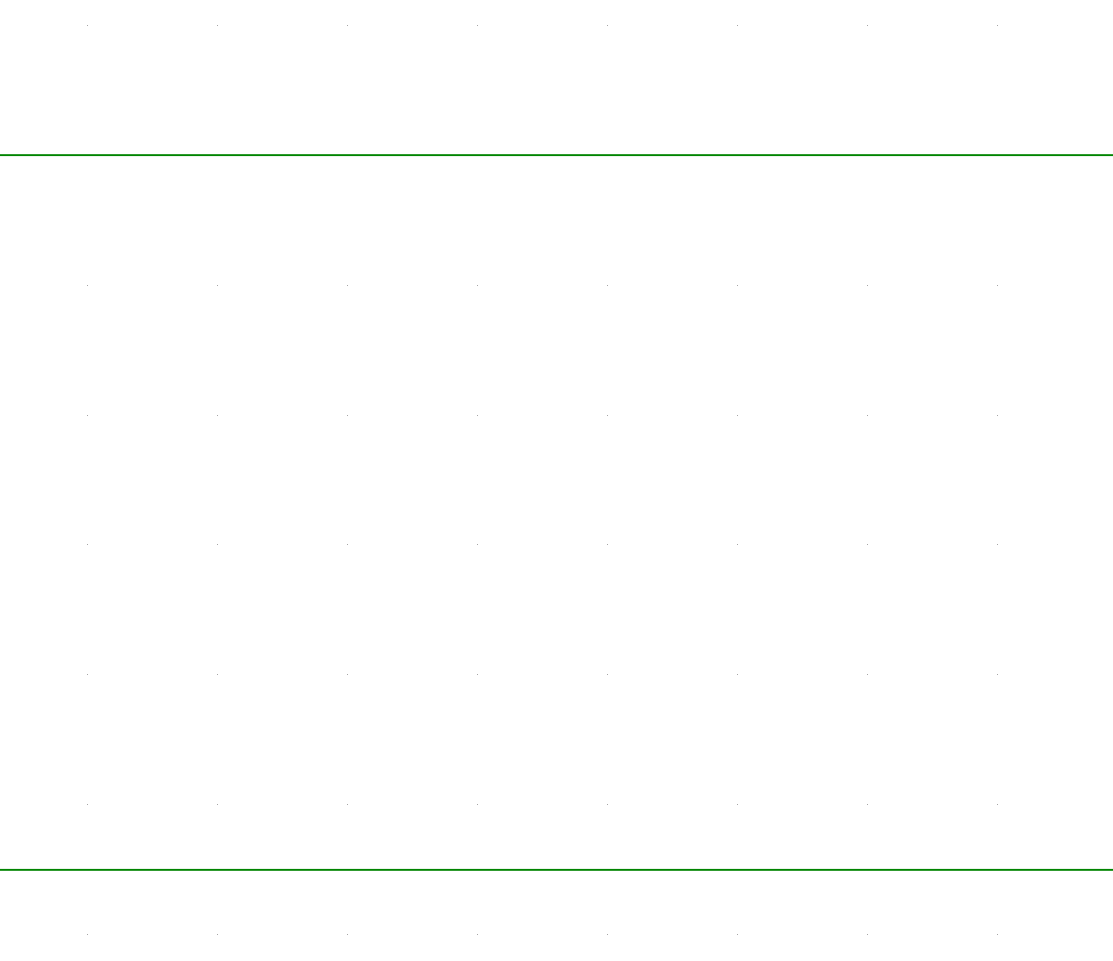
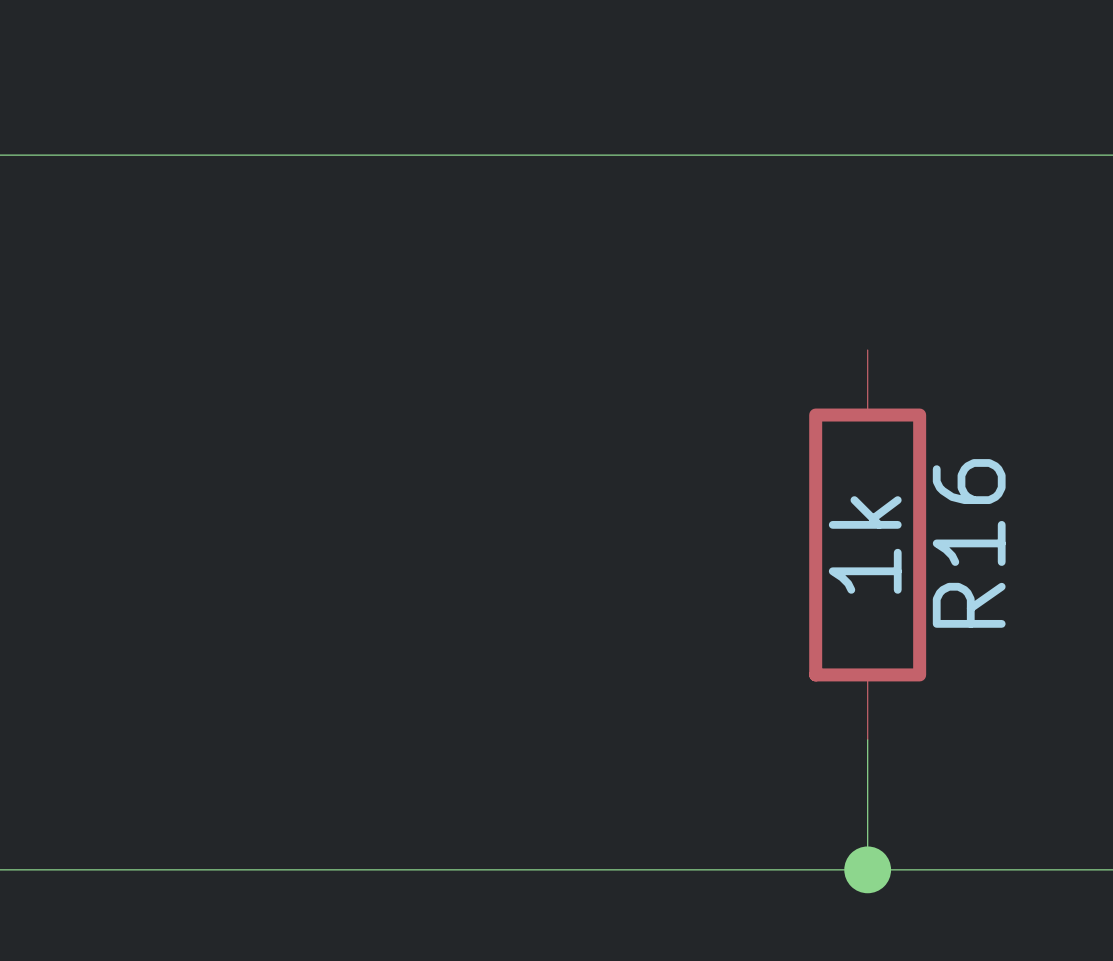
R16: none -> 1k (867, 544)
wire: none -> (867, 739) (867, 869)
junction: none -> (867, 869)

